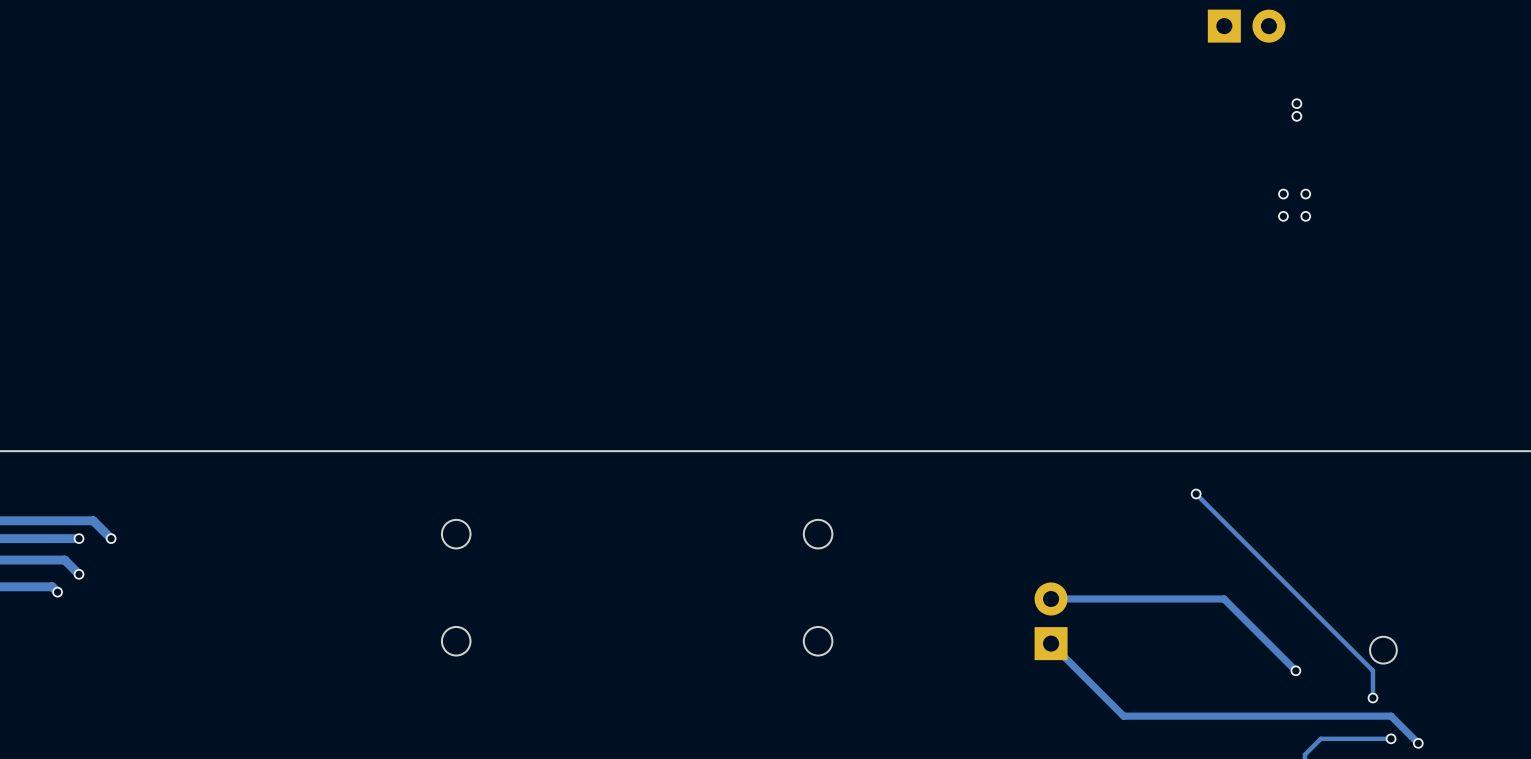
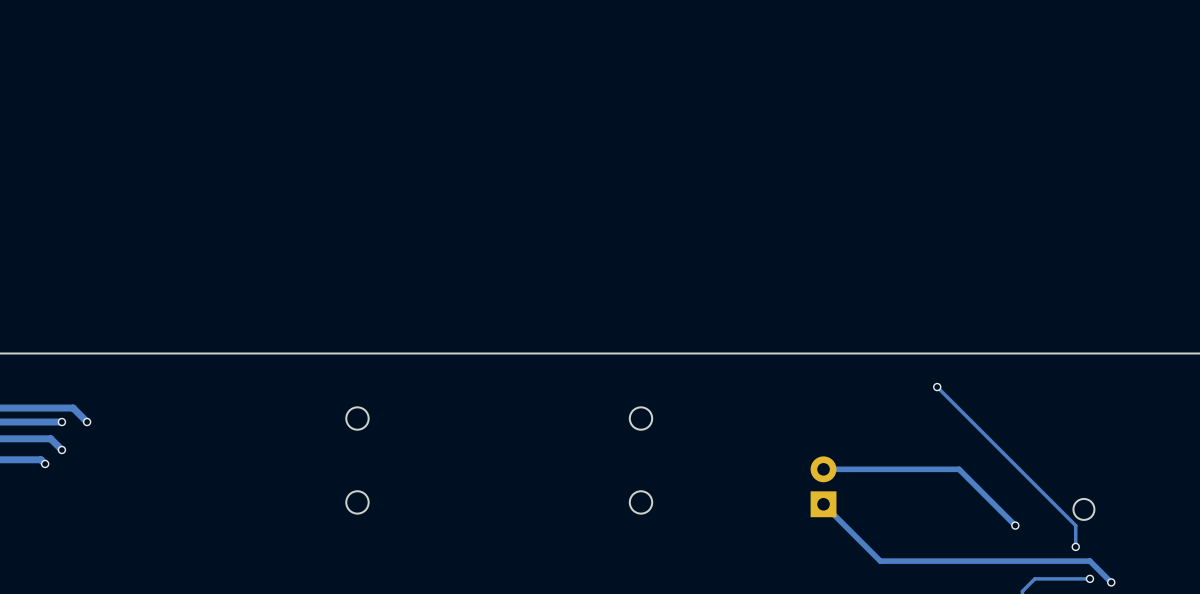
part: (1246, 26) -> none
via: (1296, 103) -> none
via: (1296, 116) -> none
via: (1283, 194) -> none
via: (1305, 194) -> none
via: (1283, 216) -> none
via: (1305, 216) -> none

